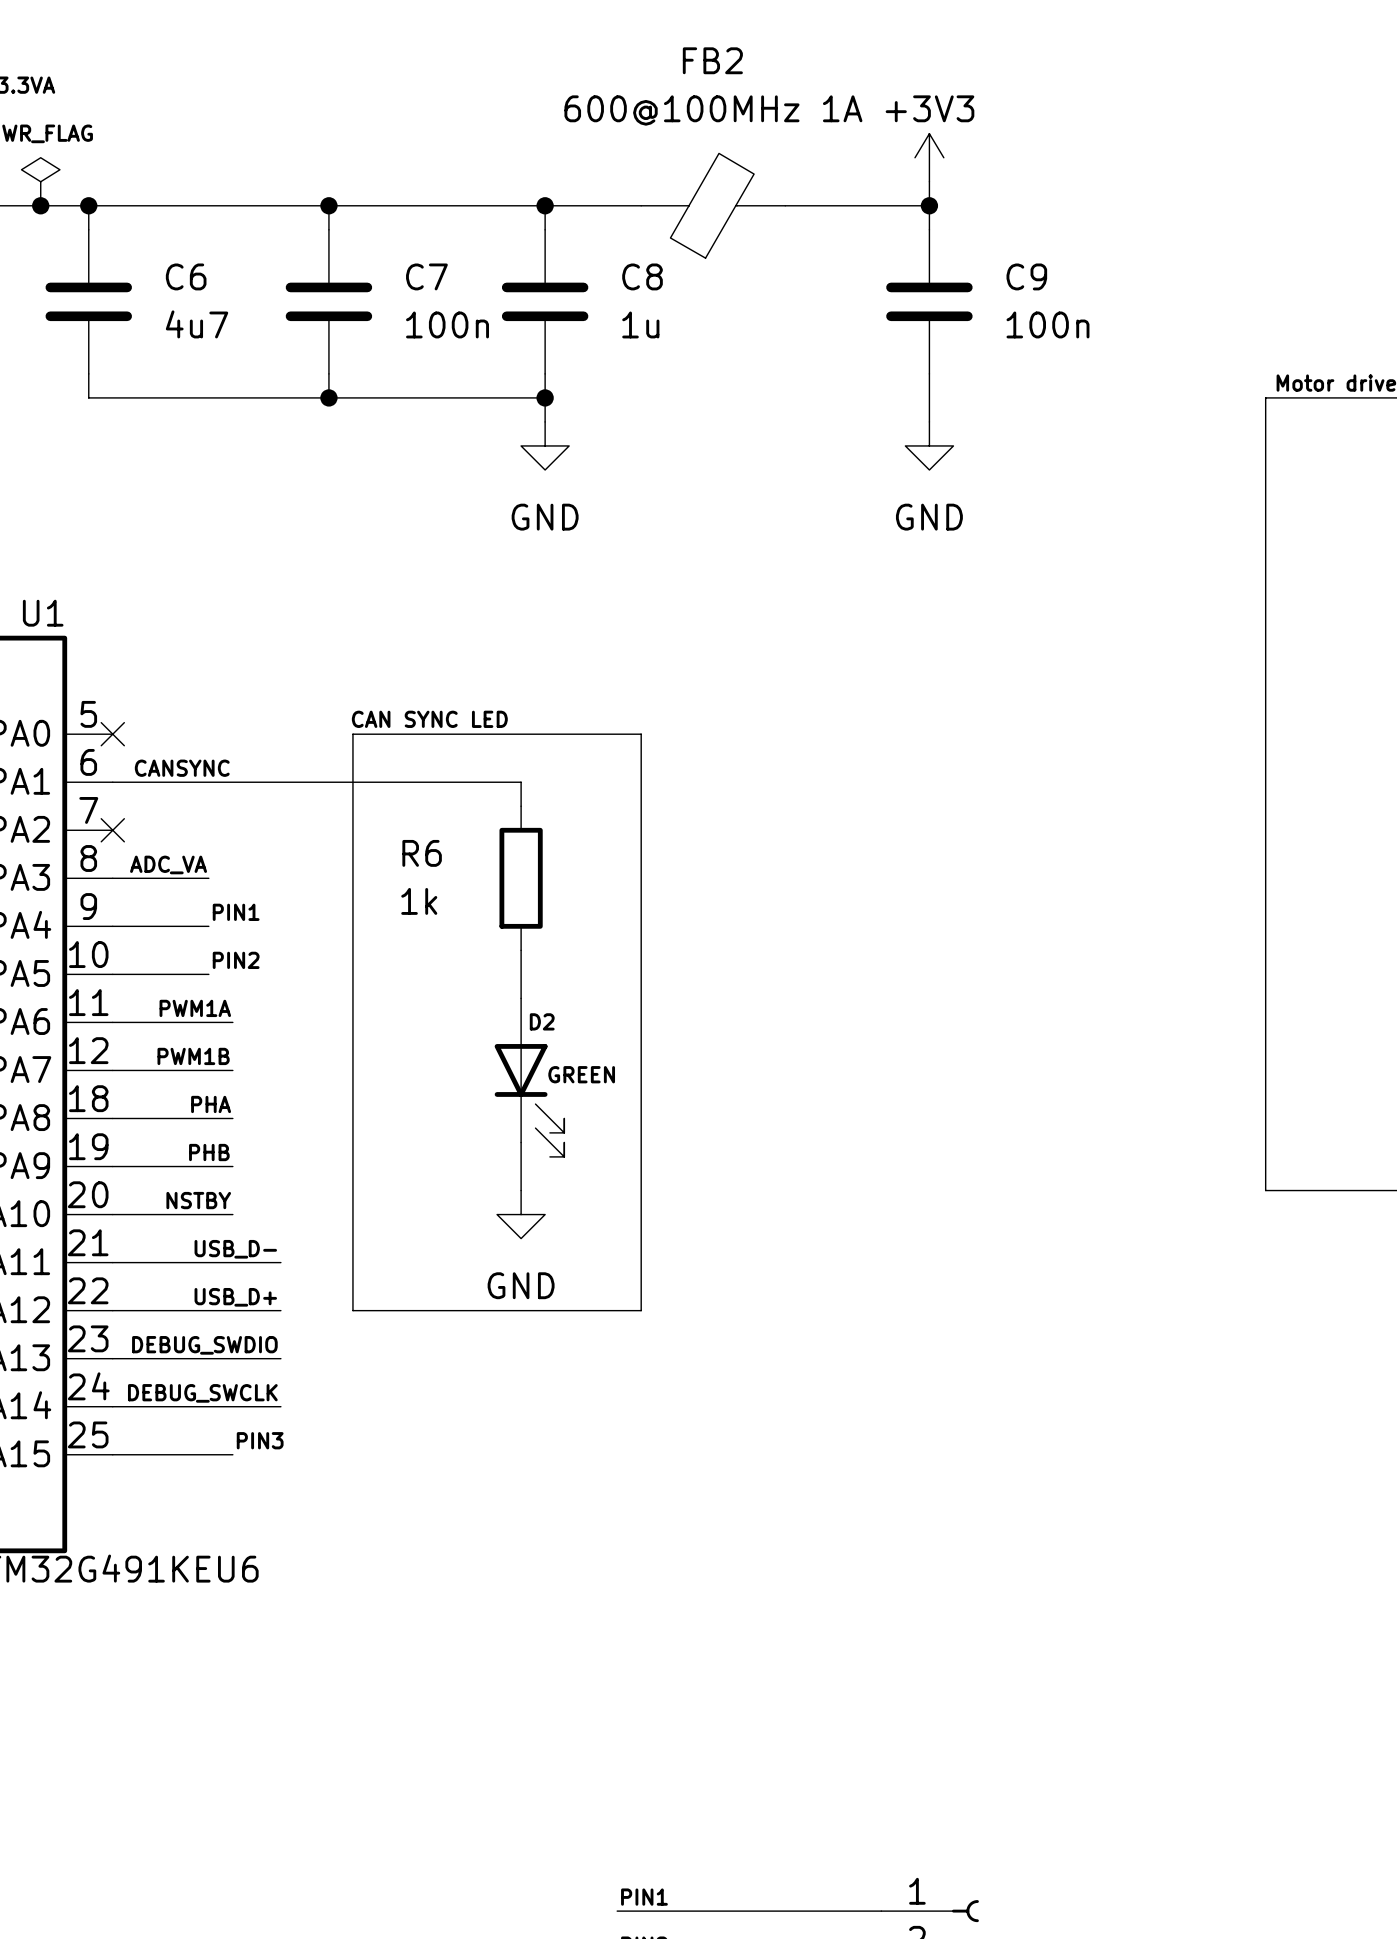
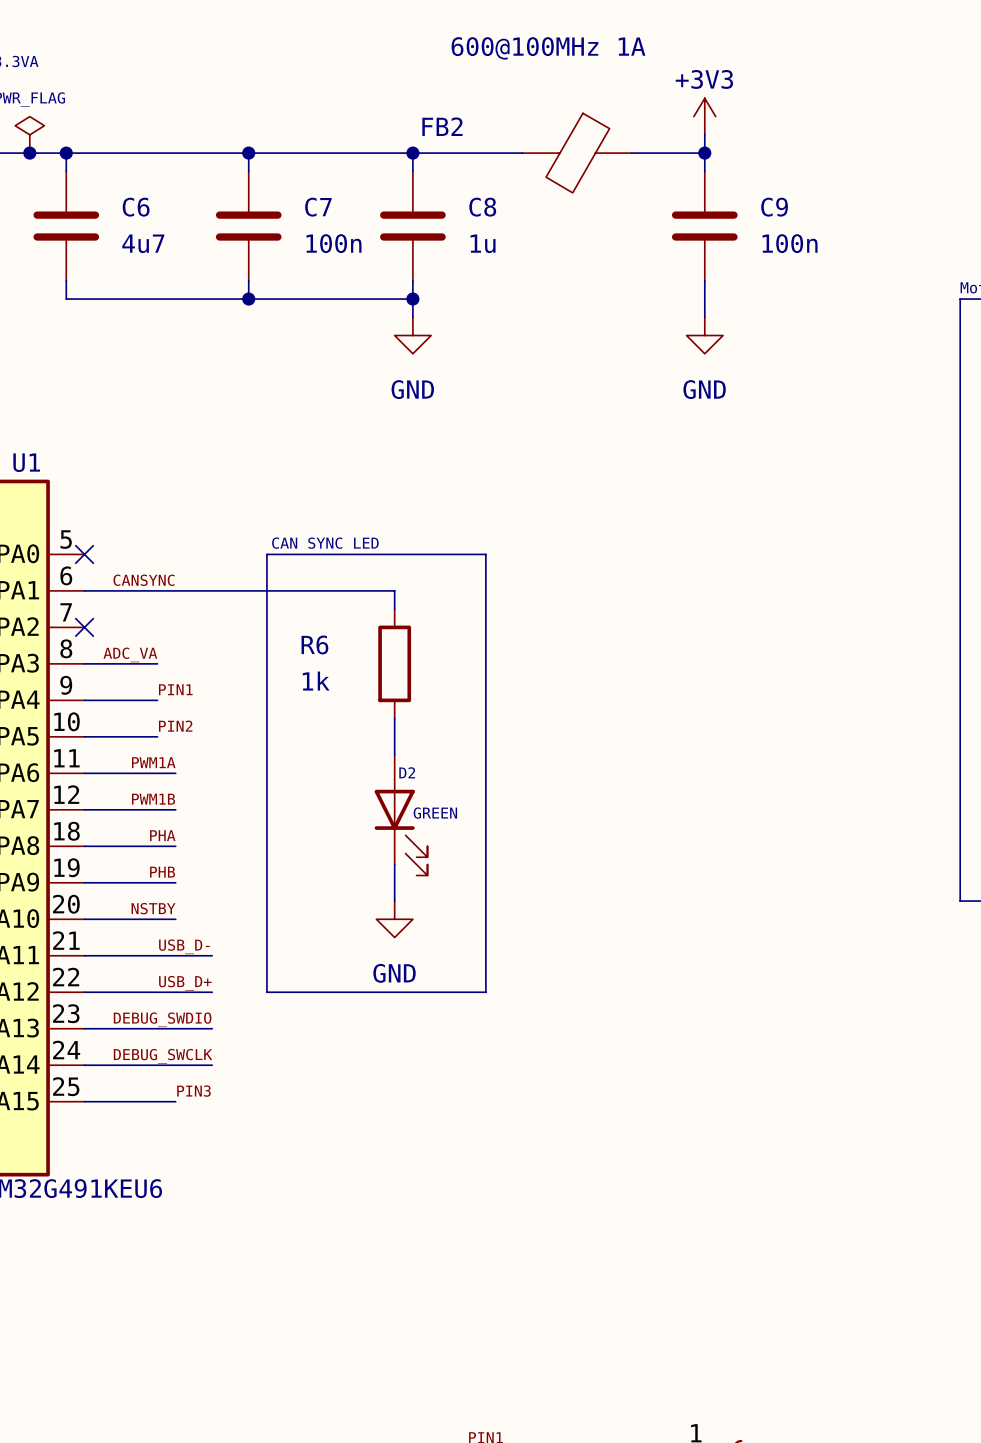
FB2 name position: FB2 (712, 60) -> FB2 (442, 126)
FB2 value position: 600@100MHz 1A (713, 110) -> 600@100MHz 1A (548, 48)
FB2 rotation: 0° (712, 205) -> 180° (577, 153)

